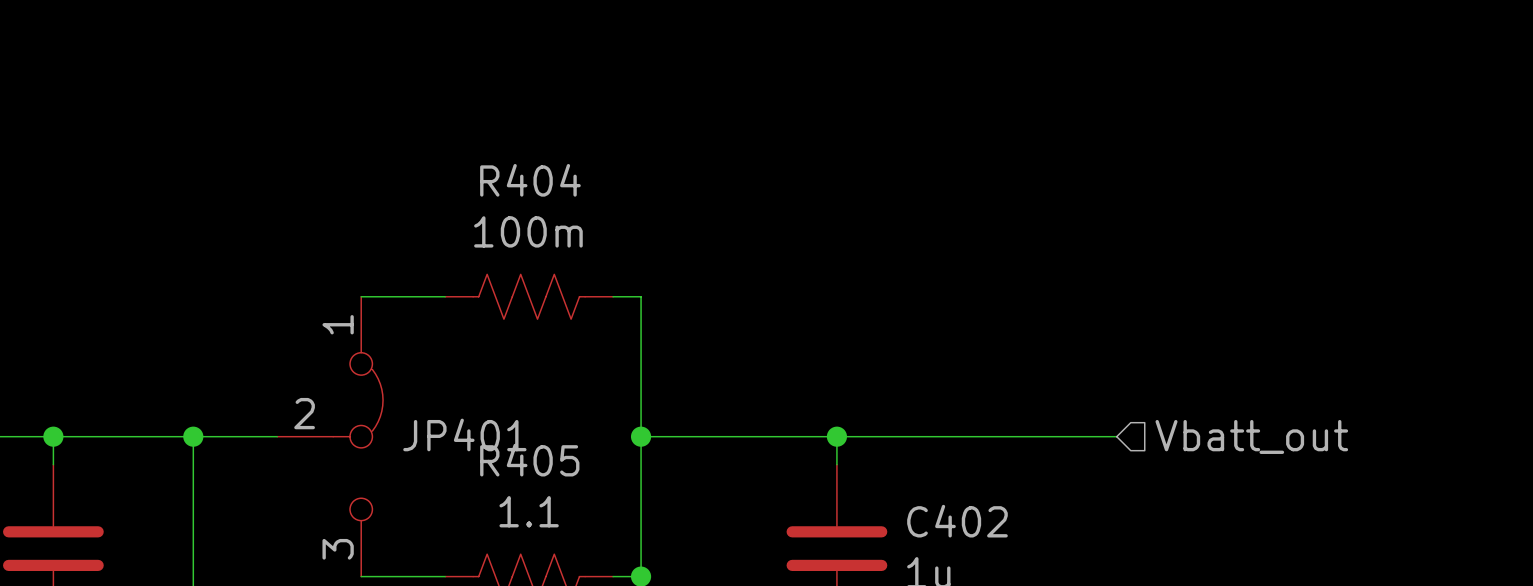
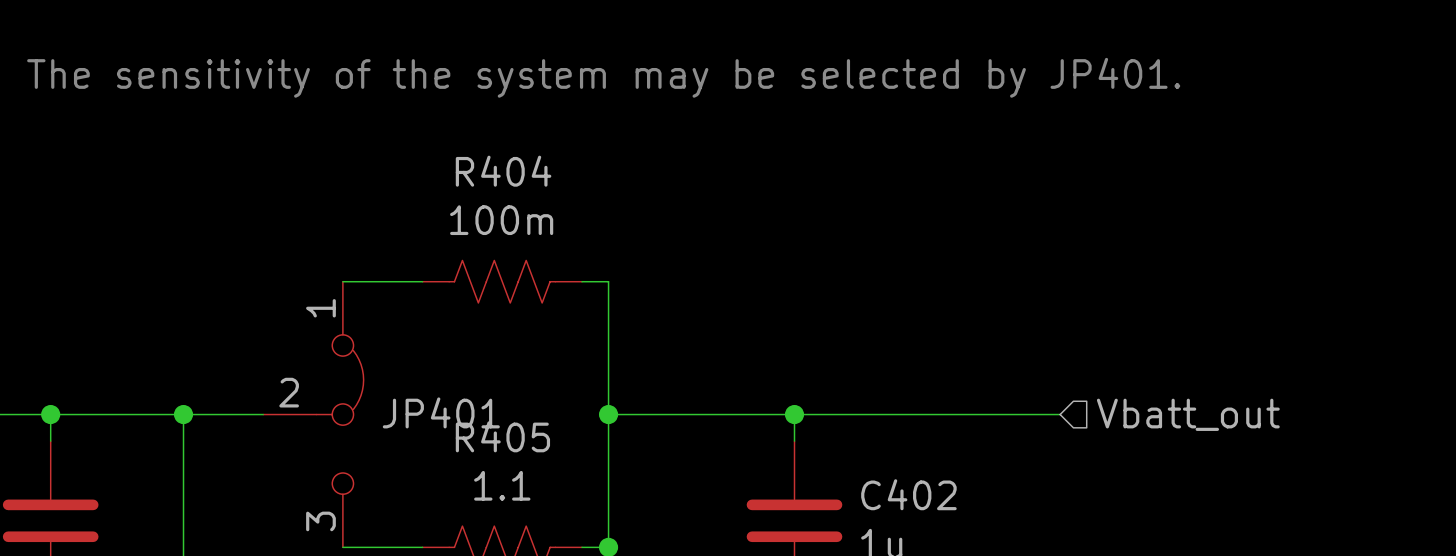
text: none -> The sensitivity of the system may be selected by JP401. (603, 77)

